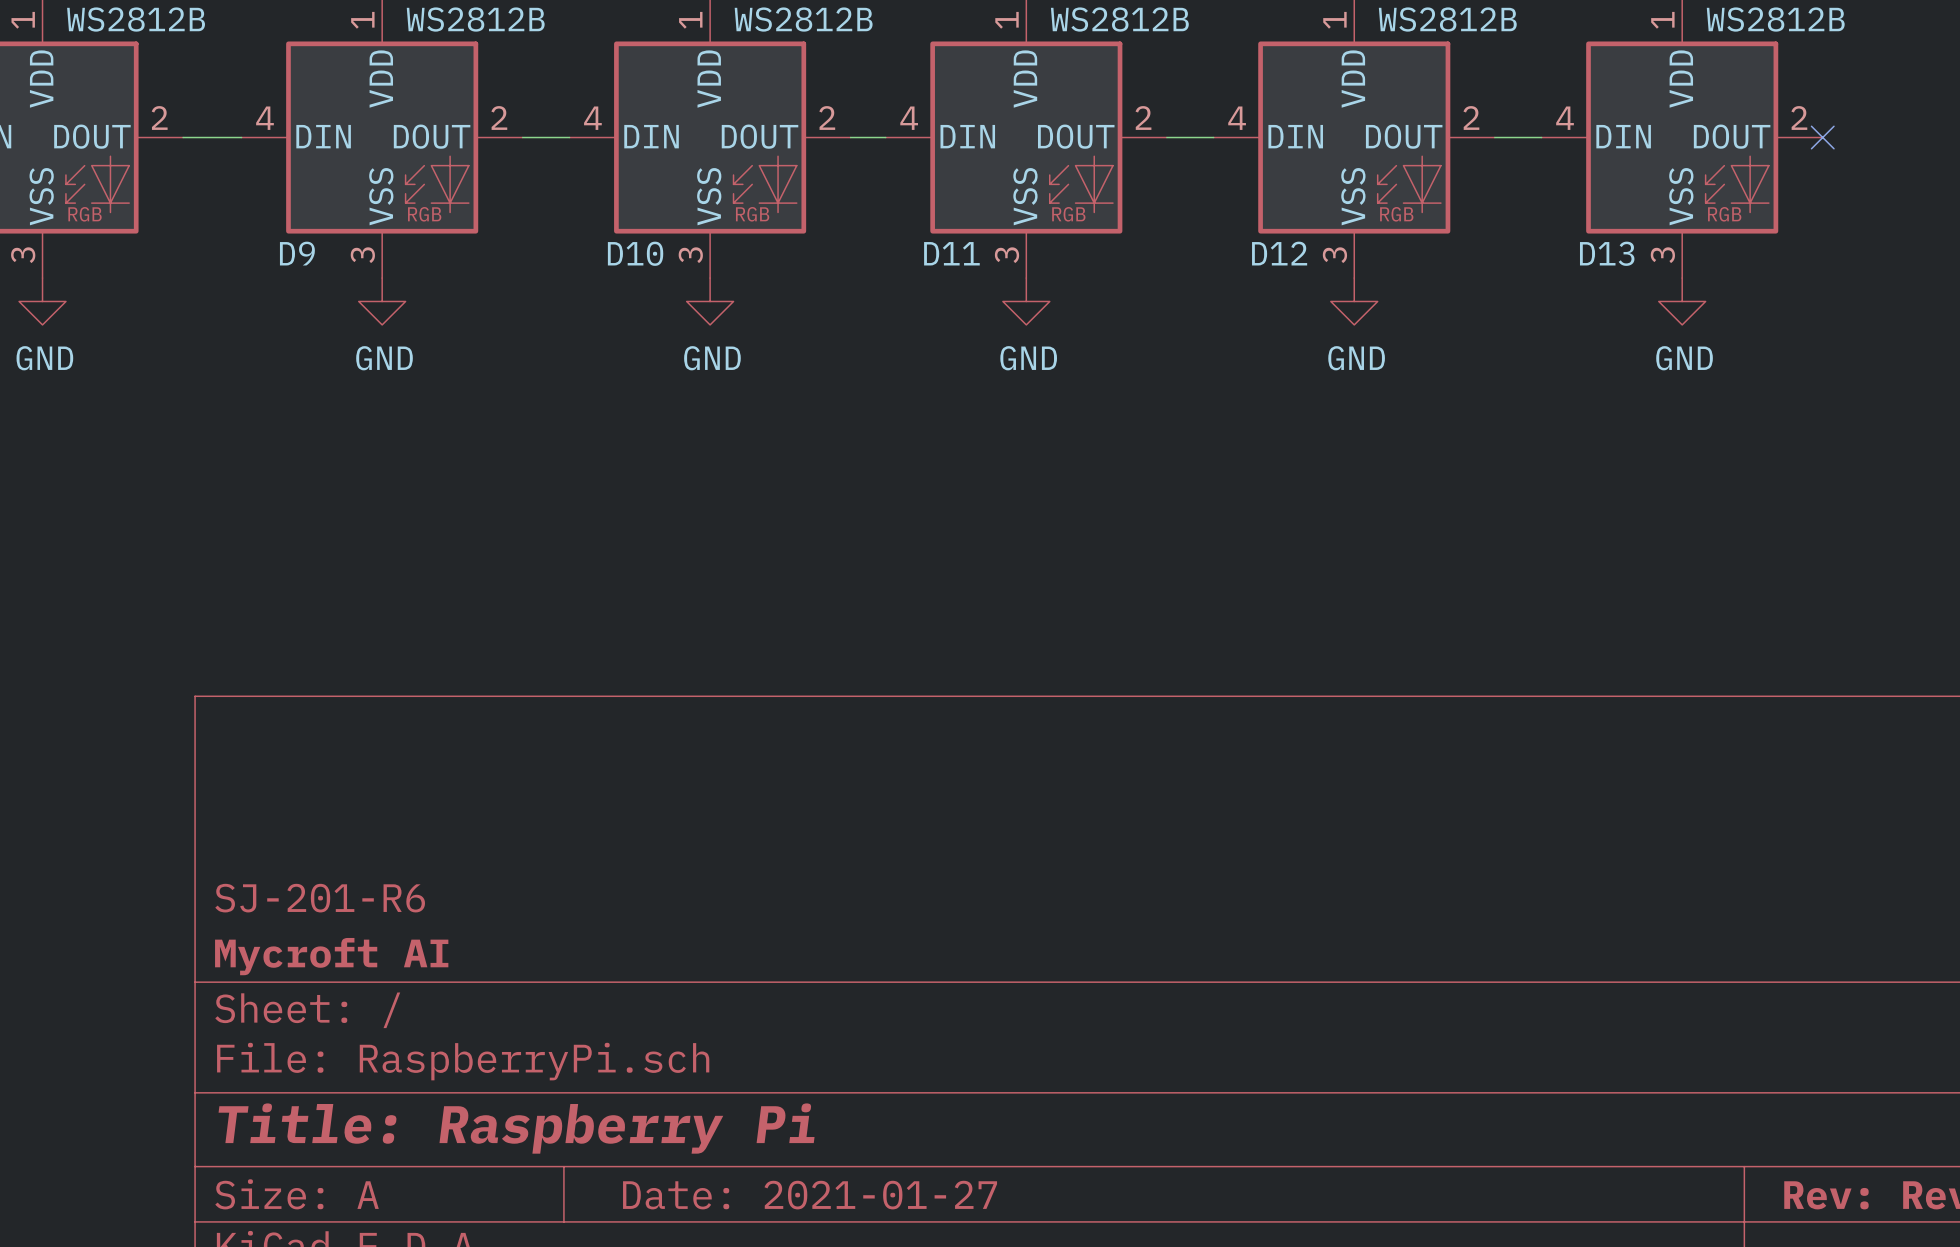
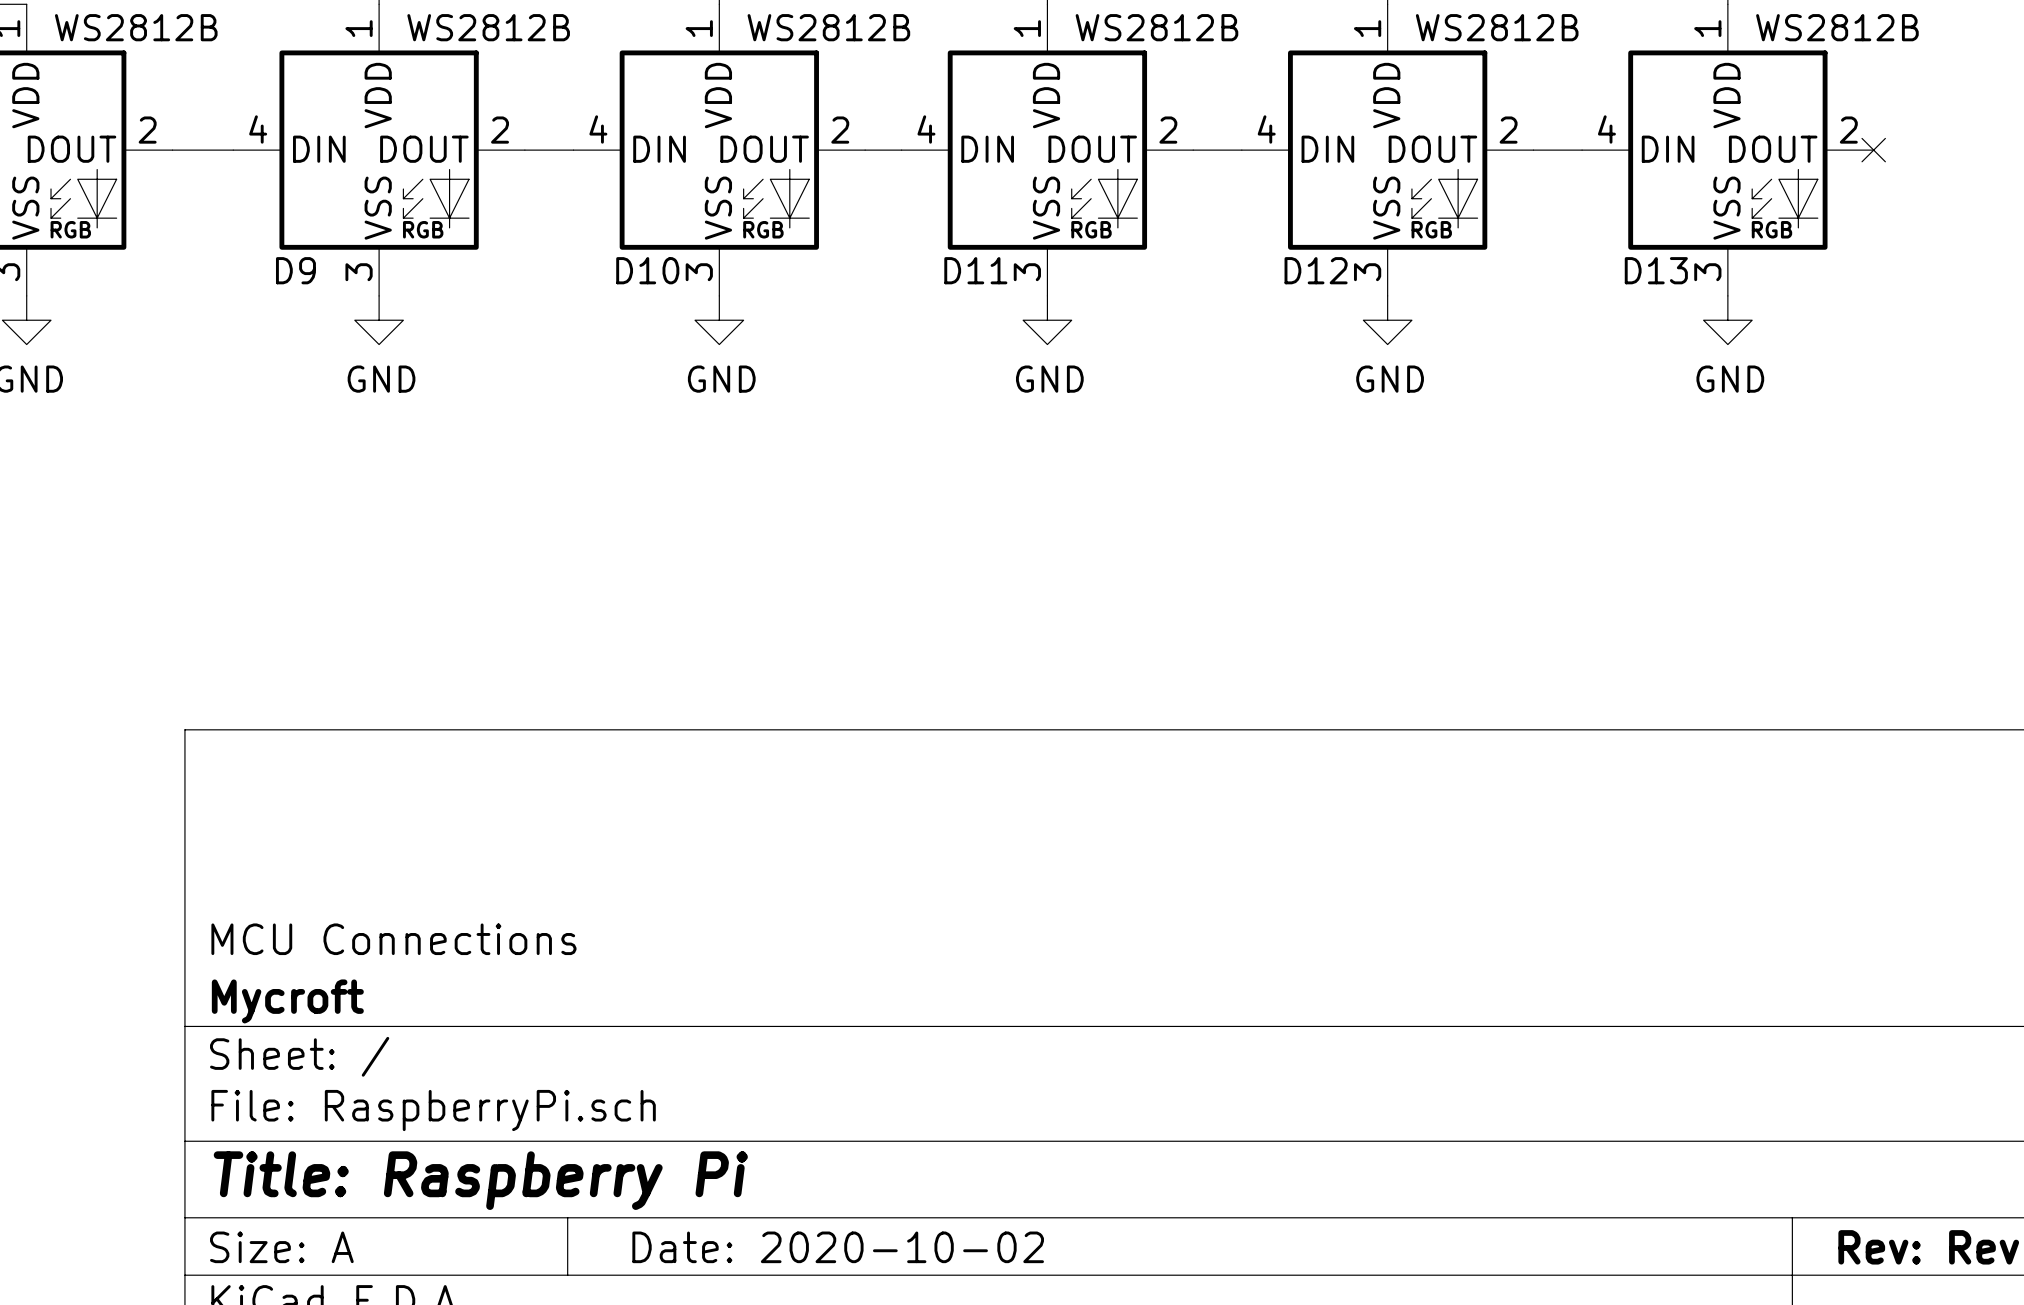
title block: SJ-201-R6 (320, 898) -> MCU Connections (393, 939)
title block: Mycroft AI (331, 956) -> Mycroft (287, 1001)
title block: Date: 2021-01-27 (810, 1195) -> Date: 2020-10-02 (838, 1247)

